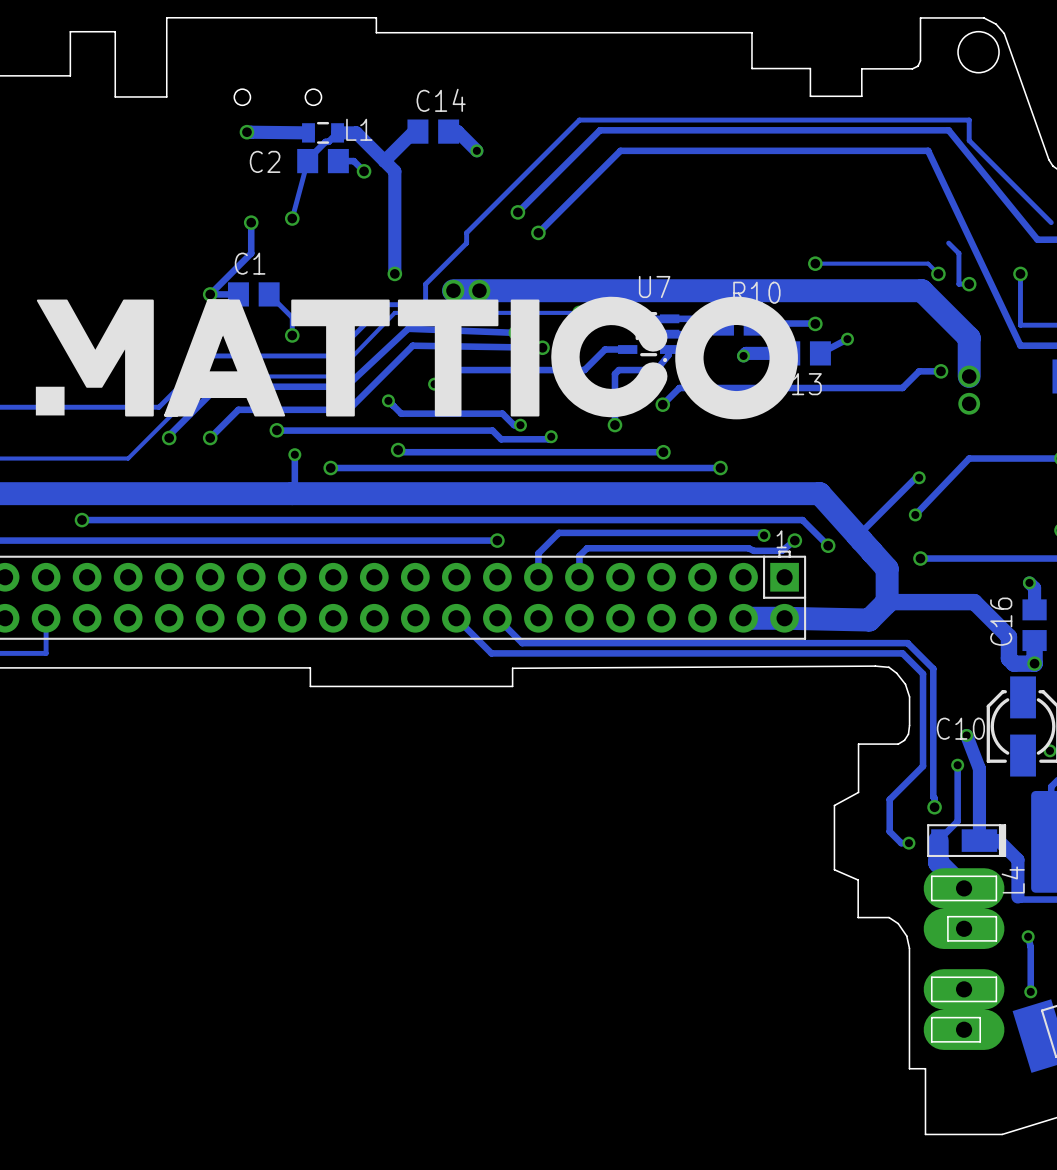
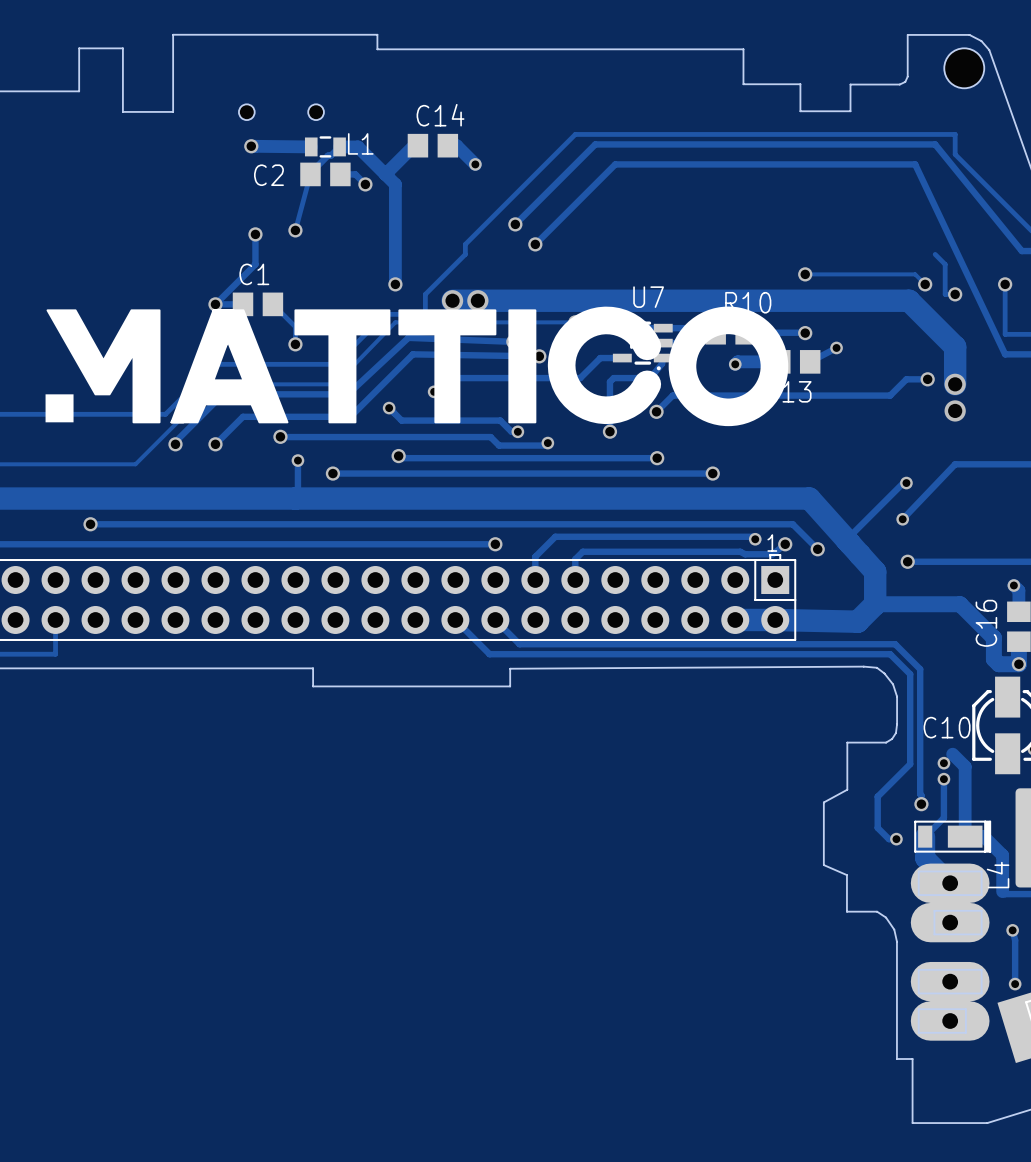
track: (966, 735) (979, 768) -> (952, 754) (965, 766)
via position: (966, 735) -> (943, 779)
track: (957, 765) (957, 781) -> none

